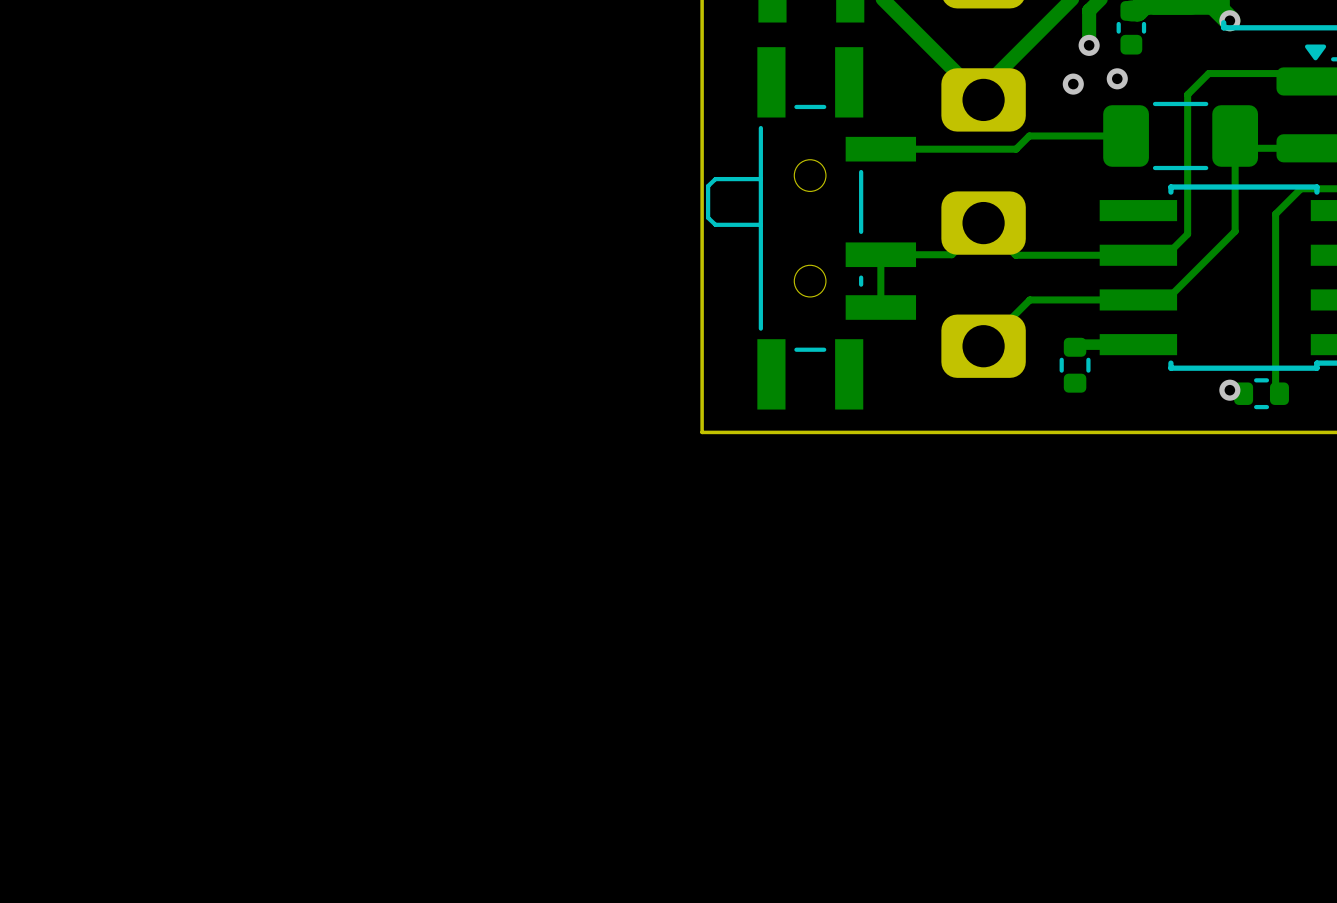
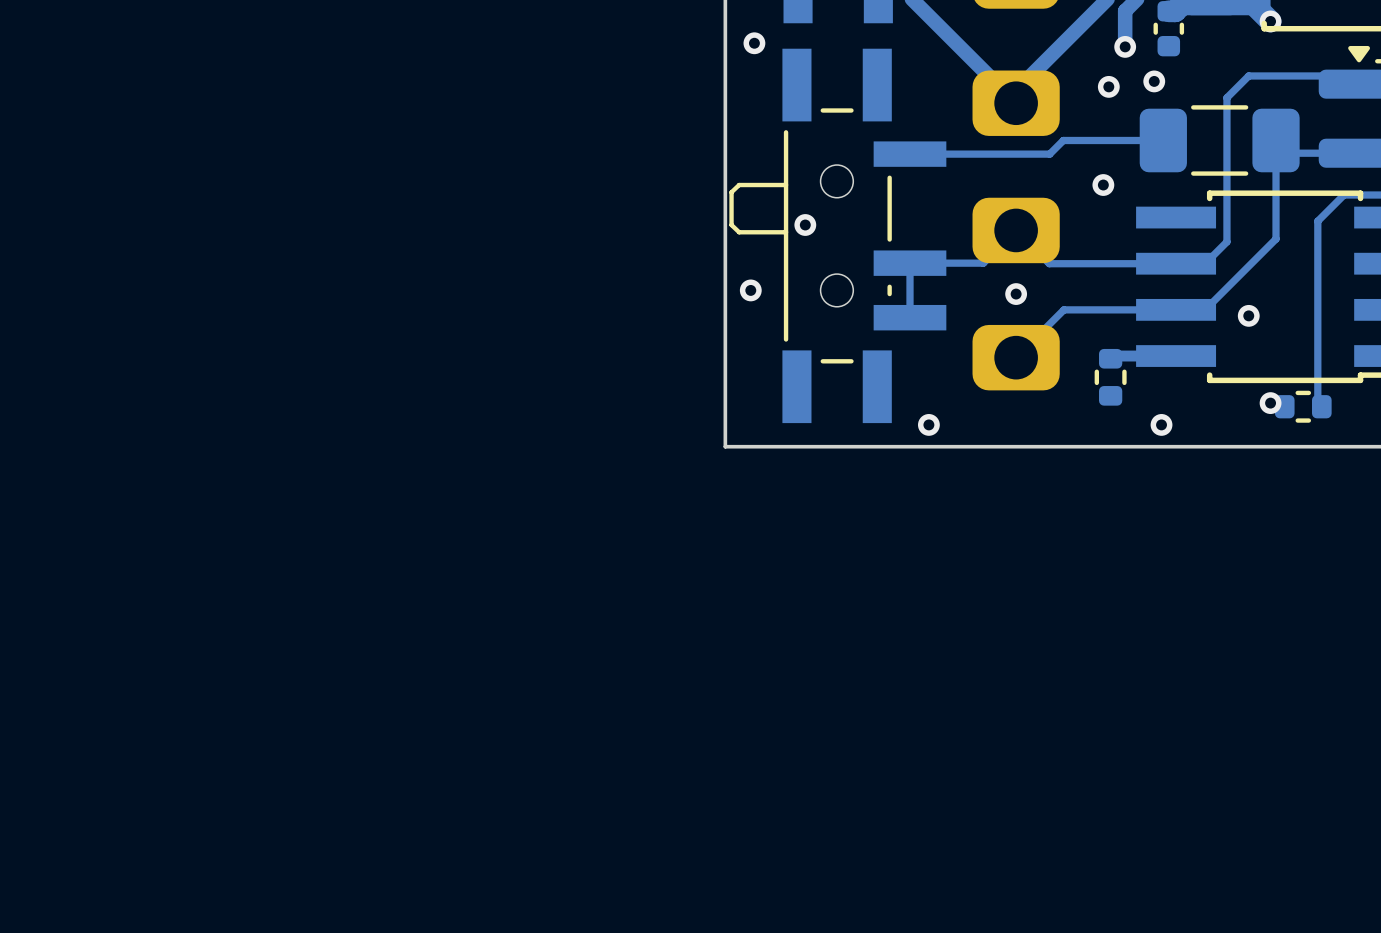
via: none -> (754, 43)
via: none -> (1103, 185)
via: none -> (805, 225)
via: none -> (750, 290)
via: none -> (1016, 294)
via: none -> (1248, 315)
via: none -> (928, 424)
via: none -> (1161, 424)

